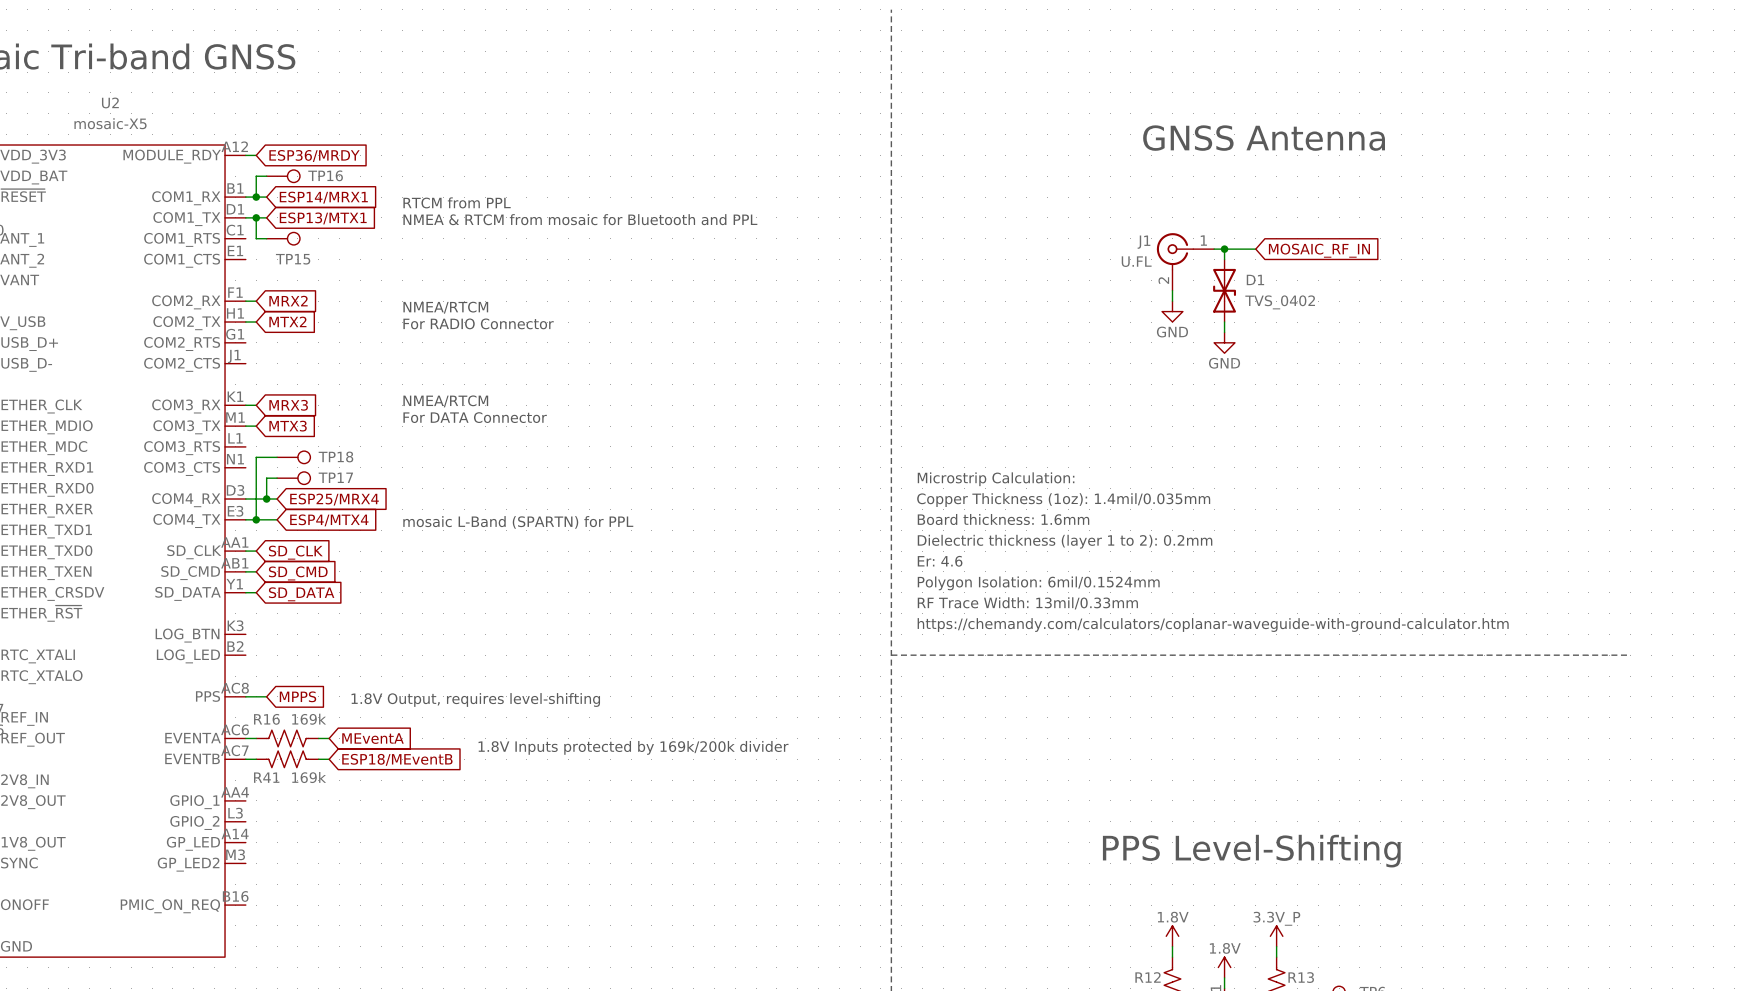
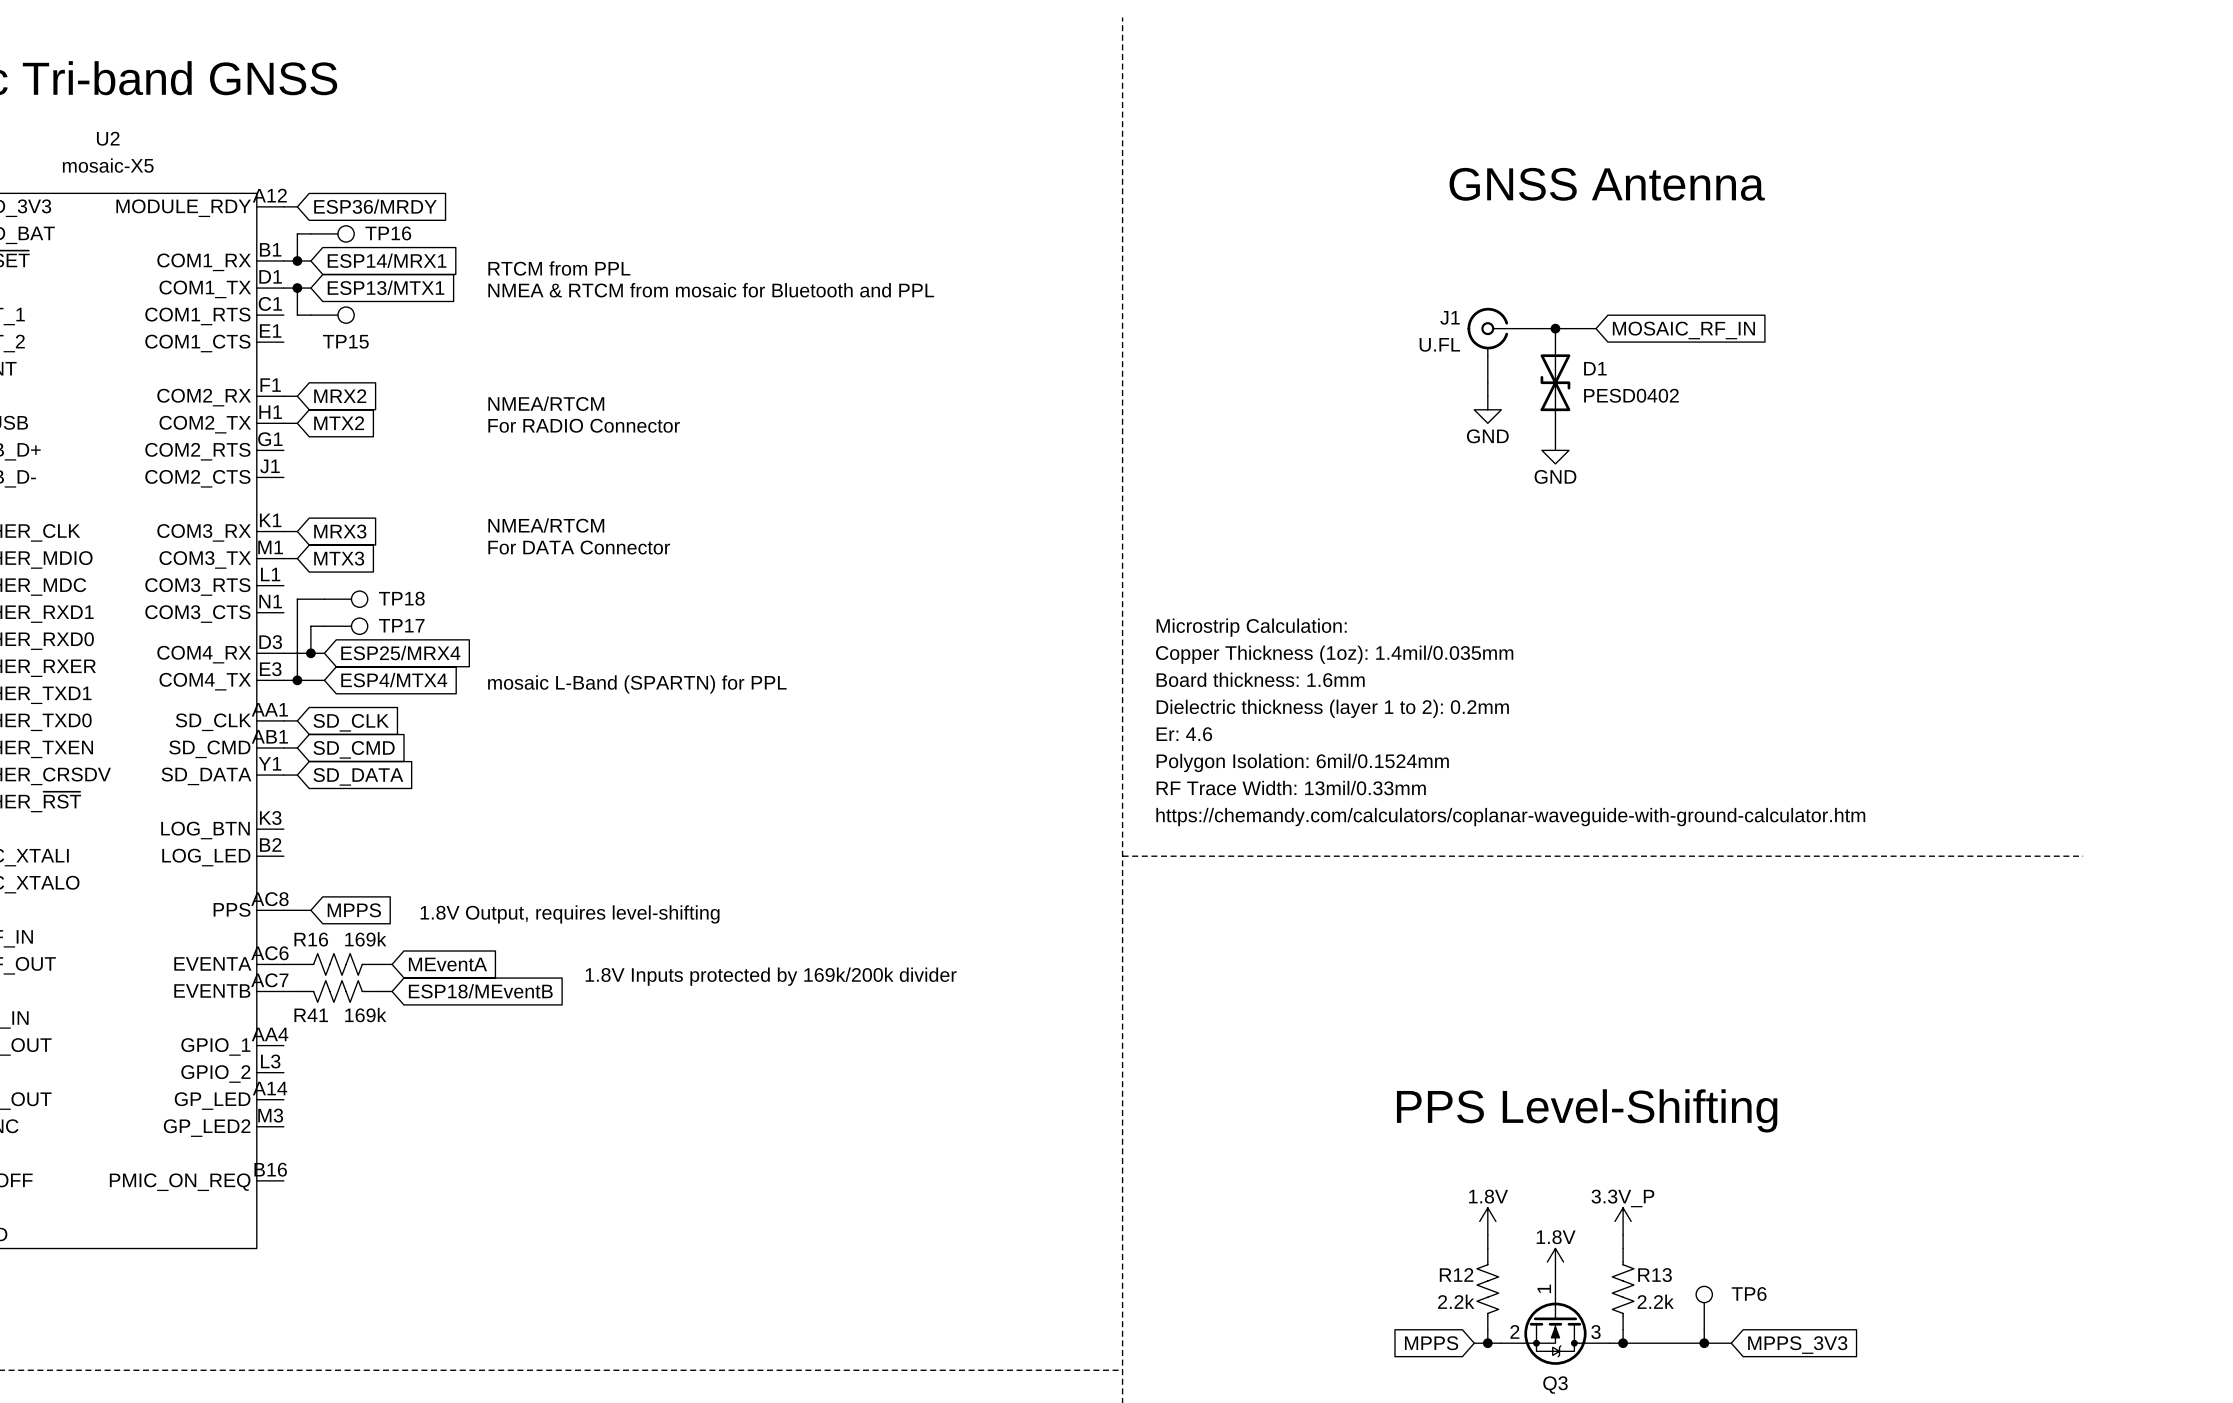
J1 pin number: 1 (1203, 240) -> none
J1 pin number: 2 (1163, 280) -> none
D1 value: TVS_0402 (1280, 302) -> PESD0402 (1631, 395)

